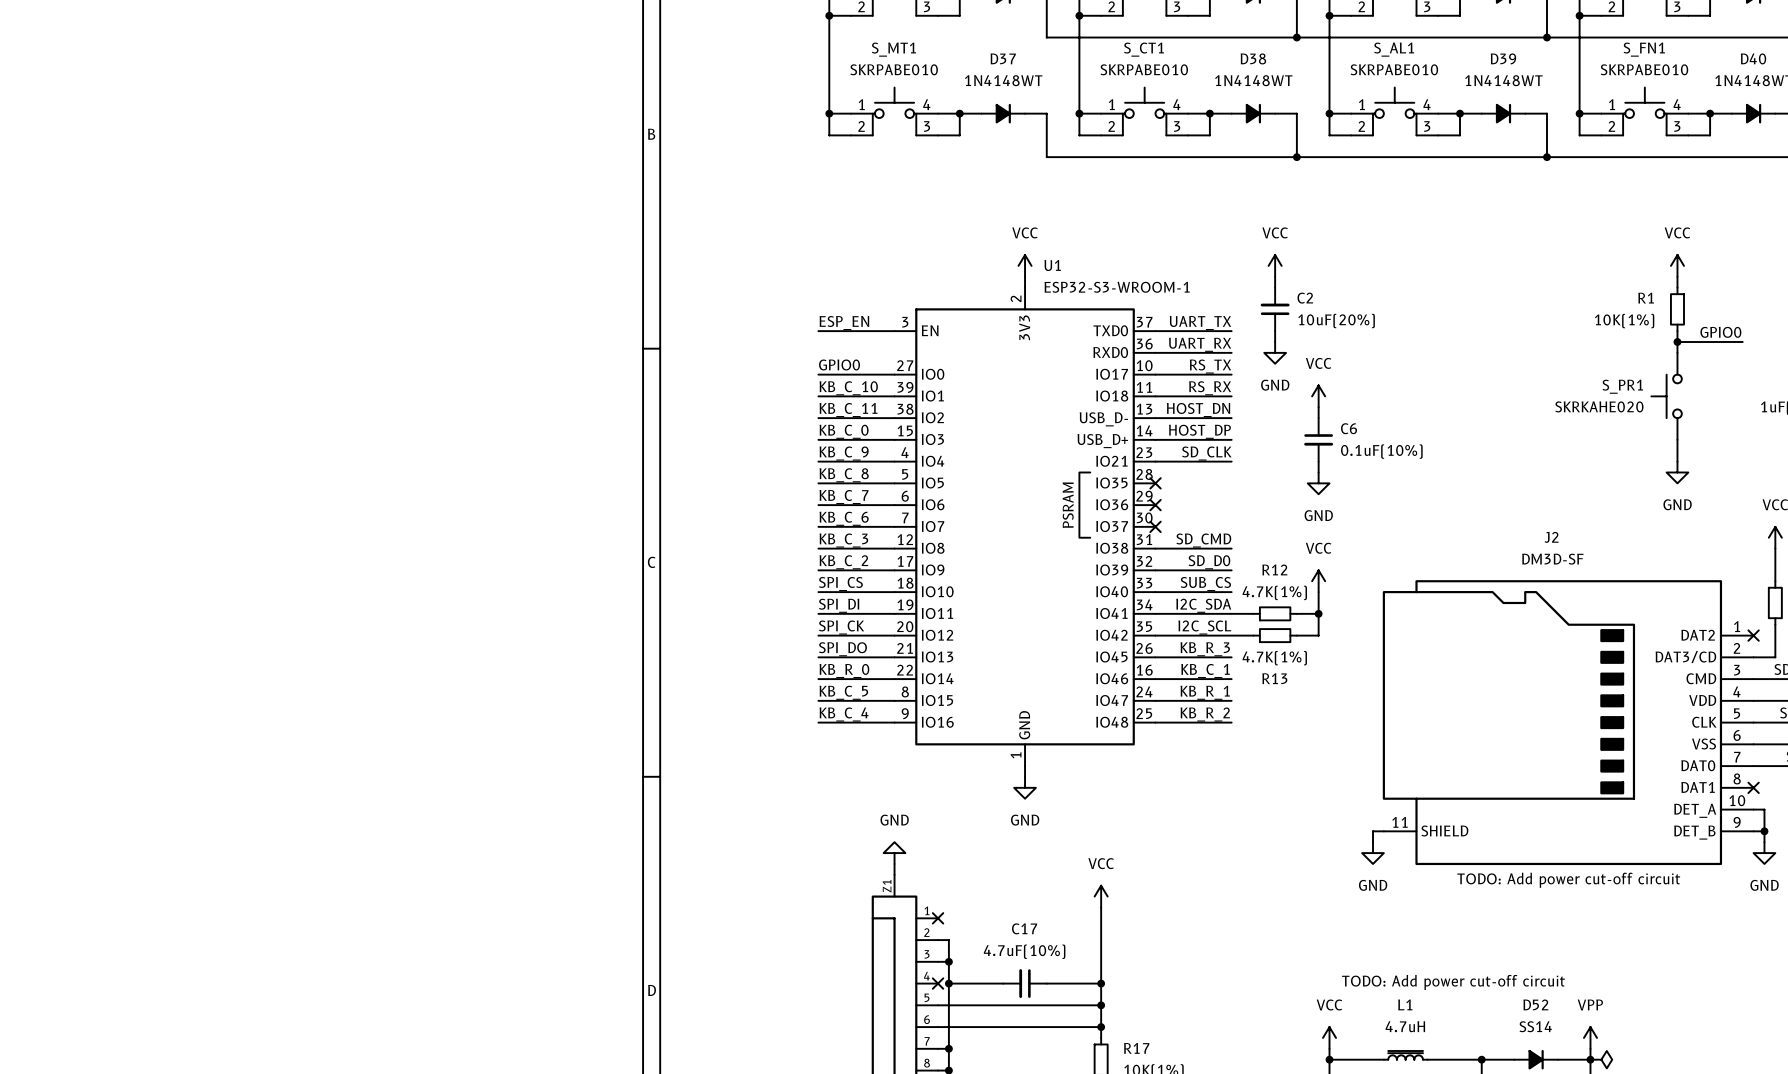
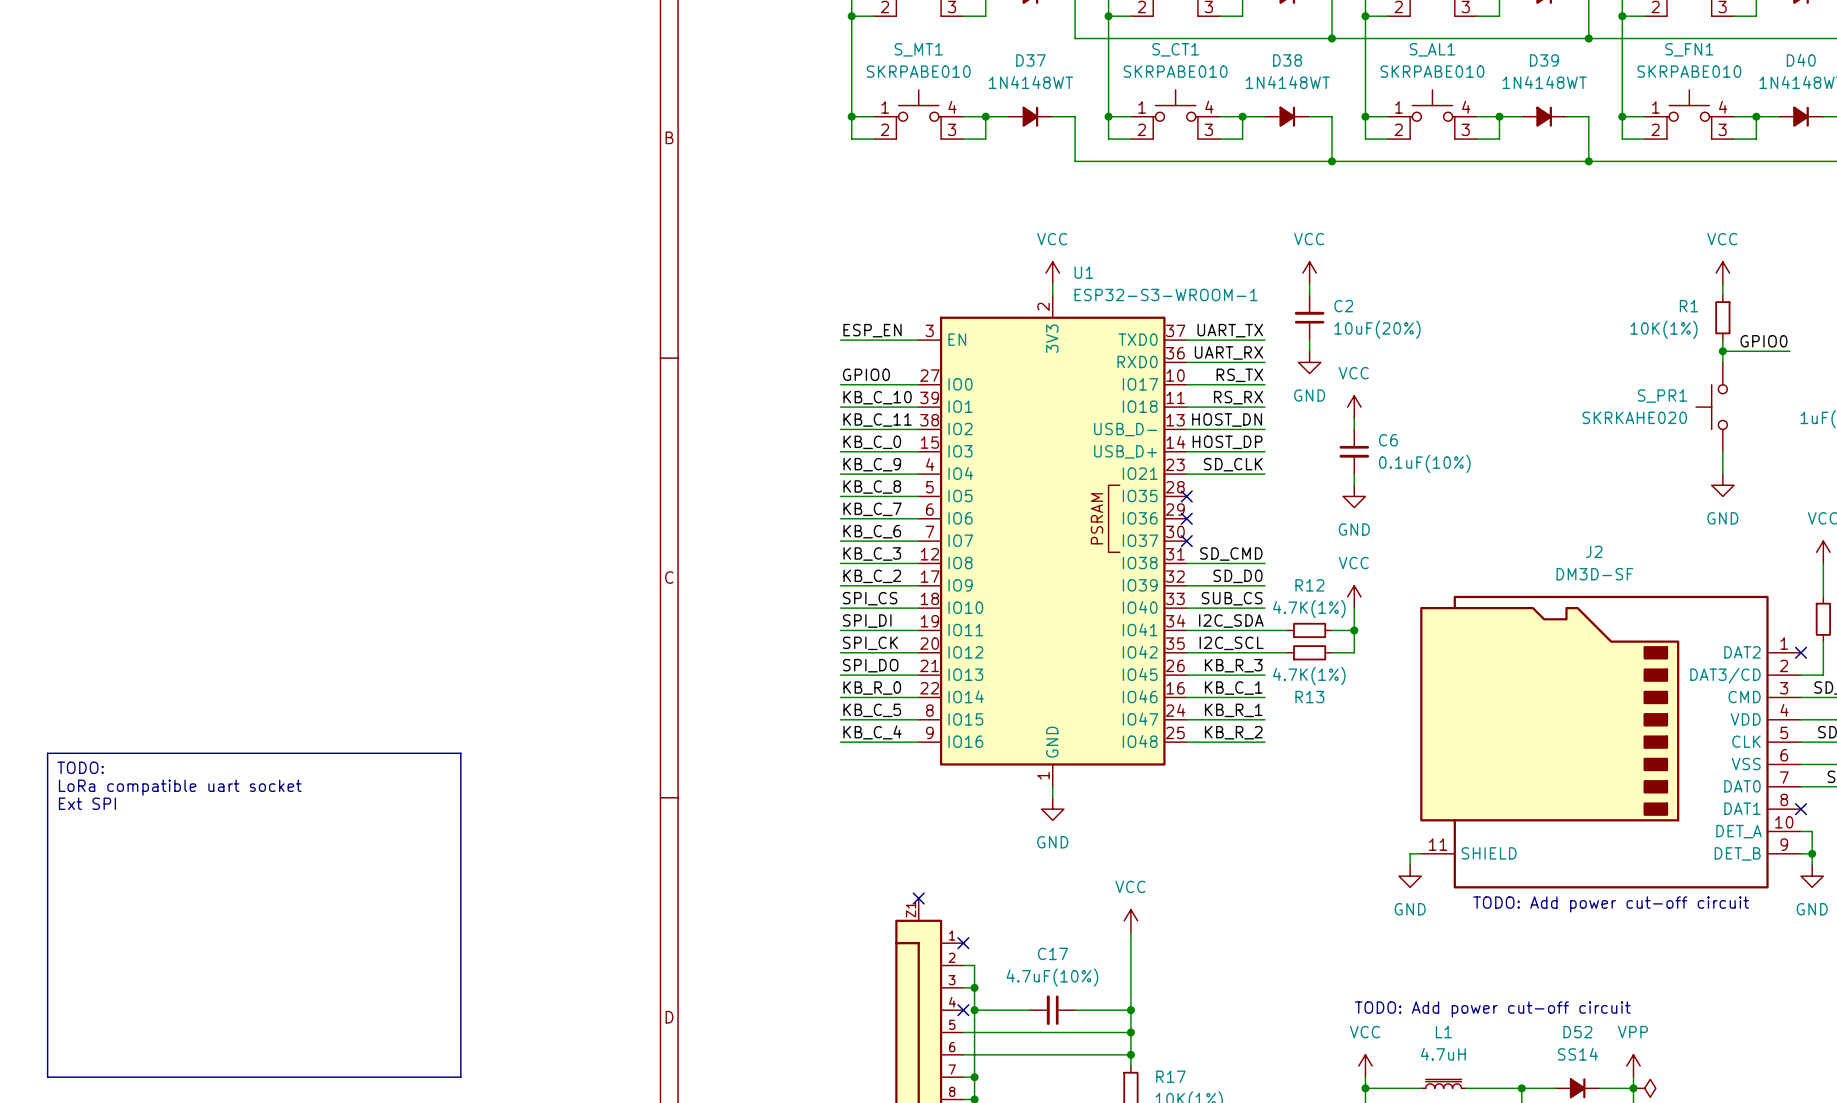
line: none -> (47, 753) (460, 753) (460, 1077) (47, 1077) (47, 753)
text: none -> TODO: (80, 767)
text: none -> LoRa compatible uart socket (180, 787)
text: none -> Ext SPI (87, 803)
power symbol: GND (894, 853) -> none
wire: (894, 863) (894, 874) -> none
no-connect mark: none -> (918, 898)

